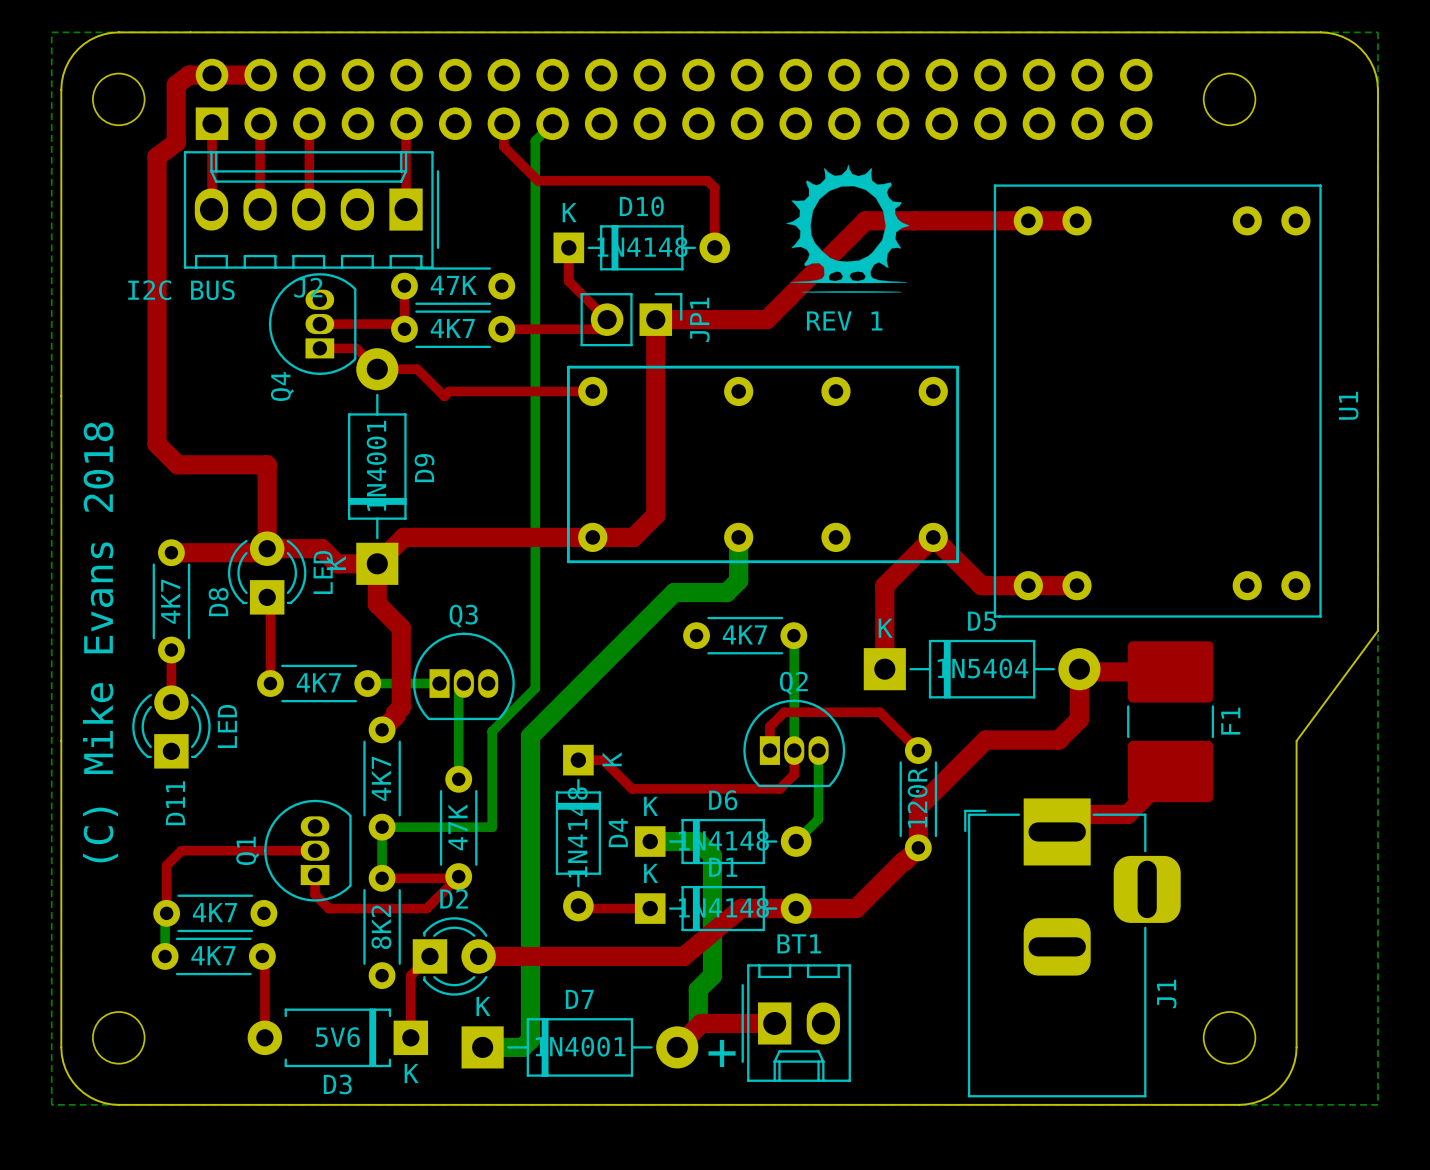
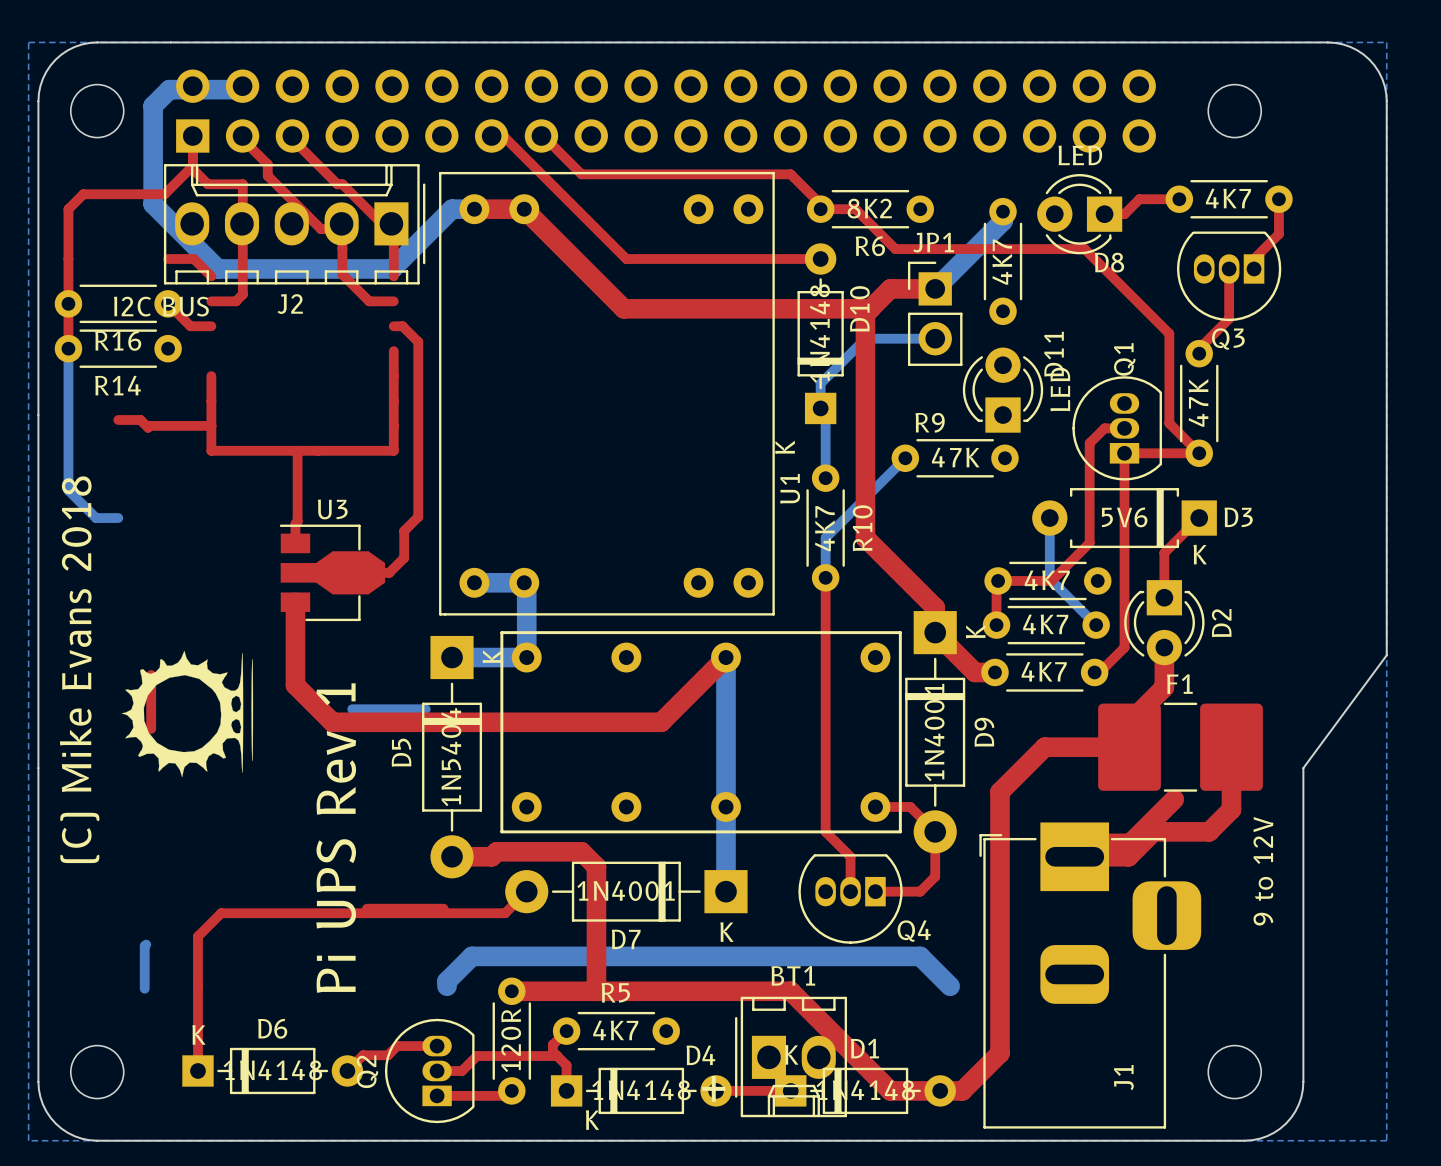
top track: (260, 75) (189, 75) (176, 85) (176, 142) (157, 156) (157, 444) (177, 464) (267, 464) (267, 548) -> none
bottom track: none -> (242, 89) (169, 89) (153, 105) (153, 204) (217, 268) (392, 268) (452, 209) (474, 209)
top track: none -> (491, 134) (501, 134) (626, 259) (820, 259)
top track: none -> (541, 134) (581, 174) (790, 174) (820, 204) (820, 209) (855, 209) (895, 249) (1084, 249) (1169, 333) (1169, 423) (1199, 453) (1124, 453) (1124, 647) (1099, 672) (1094, 672)
top track: (212, 123) (211, 209) -> none
top track: (260, 123) (260, 209) -> none
top track: (309, 123) (308, 209) -> none
top track: (406, 123) (406, 209) -> none
top track: (503, 123) (503, 146) (537, 180) (707, 180) (714, 187) (714, 247) -> none
bottom track: (552, 123) (535, 140) (535, 688) (492, 731) (492, 827) (382, 827) (382, 878) -> none
top track: none -> (192, 139) (192, 169) (207, 184) (242, 184) (242, 294) (235, 301) (211, 301)
top track: none -> (242, 139) (267, 164) (267, 175) (321, 229) (342, 229) (342, 274) (369, 301) (393, 301)
top track: none -> (292, 139) (337, 184) (342, 184) (393, 235) (393, 276)
top track: none -> (192, 165) (164, 194) (83, 194) (68, 209) (68, 348)
drawing: [786, 164, 910, 293] -> none
top track: none -> (1179, 199) (1139, 199) (1124, 214) (1104, 214)
part: none -> 4K7 (1229, 199)
top track: none -> (1278, 199) (1278, 234) (1254, 259) (1254, 268)
top track: none -> (474, 209) (524, 209) (623, 308) (870, 308)
R6: none -> 8K2 (870, 209)
bottom track: none -> (1003, 211) (1003, 221) (935, 288)
D10 name position: D10 (641, 206) -> D10 (859, 308)
top track: (1077, 220) (865, 220) (766, 319) (655, 319) (655, 515) (633, 537) (403, 537) (377, 563) -> none
D10 footprint: [553, 225, 731, 271] -> [797, 243, 844, 425]
top track: none -> (168, 259) (193, 259) (211, 276)
part: none -> 4K7 (1003, 261)
top track: (568, 247) (568, 281) (607, 319) (597, 329) (501, 329) -> none
top track: none -> (1229, 268) (1229, 318) (1199, 348) (1199, 353)
top track: none -> (935, 288) (890, 288) (865, 313) (865, 537) (935, 607) (935, 632) (975, 672) (995, 672)
top track: (404, 286) (404, 329) (399, 324) (319, 324) -> none
part: 47K (453, 286) -> none
R16: none -> (118, 303)
top track: none -> (168, 303) (190, 326) (211, 326)
top track: none -> (393, 326) (402, 326) (418, 341) (418, 516) (404, 530) (404, 557) (389, 572) (298, 572)
JP1 rotation: 0° (631, 319) -> 90° counterclockwise (935, 313)
JP1 position: (631, 319) -> (935, 313)
text: REV 1 (844, 320) -> none
bottom track: none -> (935, 338) (865, 338) (820, 383) (820, 408) (825, 413) (825, 478)
Q4 rotation: 0° (312, 324) -> 90° counterclockwise (850, 899)
Q4 position: (312, 324) -> (850, 899)
part: 4K7 (453, 329) -> none
bottom track: none -> (68, 348) (68, 490) (96, 518) (118, 518)
R14: none -> (118, 348)
top track: none -> (393, 351) (393, 450) (211, 450) (211, 376)
top track: (319, 348) (356, 348) (377, 369) (417, 369) (444, 396) (449, 391) (592, 391) -> none
part: none -> 47K (1199, 403)
top track: none -> (118, 419) (140, 419) (148, 427) (149, 425) (211, 425)
U1 position: (1157, 401) -> (606, 393)
U1 name position: U1 (1348, 405) -> U1 (790, 488)
top track: none -> (1124, 428) (1104, 428) (1089, 443) (1089, 542) (1051, 580) (998, 580) (996, 582) (996, 625)
top track: none -> (297, 450) (297, 521) (295, 523) (295, 543)
bottom track: none -> (905, 458) (825, 537) (825, 577)
R9: none -> 47K (955, 458)
part rotation: 0° (763, 464) -> 180° (701, 732)
part position: (763, 464) -> (701, 732)
D9 rotation: 0° (377, 466) -> 180° (935, 732)
D9 position: (377, 466) -> (935, 732)
bottom track: none -> (1049, 518) (1049, 578) (1096, 625)
top track: none -> (1199, 518) (1164, 552) (1164, 597)
R10: none -> 4K7 (825, 528)
bottom track: (738, 537) (738, 580) (726, 592) (674, 592) (530, 736) (530, 1039) (522, 1047) (482, 1047) -> none
top track: (267, 548) (321, 548) (337, 563) (377, 563) -> none
top track: (267, 548) (263, 552) (171, 552) -> none
U3: none -> (332, 572)
top track: none -> (825, 577) (825, 831) (850, 856) (850, 891)
part: none -> 4K7 (1047, 580)
bottom track: none -> (474, 582) (524, 582) (526, 585) (526, 657) (452, 657)
top track: (377, 563) (377, 604) (401, 627) (401, 707) (382, 729) -> none
D8 rotation: 0° (267, 573) -> 90° counterclockwise (1079, 214)
D8 position: (267, 573) -> (1079, 214)
top track: none -> (295, 602) (295, 685) (332, 722) (661, 722) (726, 657)
top track: (1077, 585) (981, 585) (933, 537) (884, 585) (884, 669) -> none
top track: (267, 597) (270, 600) (270, 683) -> none
part: 4K7 (171, 601) -> none
part: none -> 4K7 (1046, 625)
D5 name position: D5 (981, 621) -> D5 (401, 752)
top track: none -> (1164, 647) (1164, 687) (1129, 722) (1129, 747) (1044, 747) (999, 792) (999, 1053) (962, 1090) (890, 1090) (790, 991) (511, 991)
drawing: none -> [121, 650, 254, 778]
bottom track: none -> (726, 657) (726, 891)
part: 4K7 (745, 635) -> none
bottom track: (793, 635) (794, 750) -> none
part: none -> 4K7 (1044, 672)
D5 rotation: 0° (982, 669) -> 90° clockwise (452, 757)
D5 position: (982, 669) -> (452, 757)
top track: (1170, 671) (1082, 671) (1079, 669) (1079, 719) (1058, 740) (985, 740) (918, 807) (918, 847) (856, 908) (741, 908) (683, 956) (478, 956) -> none
Q3 rotation: 0° (463, 676) -> 180° (1229, 276)
Q3 position: (463, 676) -> (1229, 276)
part: 4K7 (319, 683) -> none
bottom track: (463, 683) (458, 688) (458, 779) -> none
top track: none -> (1231, 747) (1231, 809) (1209, 831) (1153, 831) (1128, 856) (1074, 856)
F1 rotation: 0° (1170, 721) -> 90° clockwise (1180, 747)
F1 name position: F1 (1230, 721) -> F1 (1179, 684)
D11 position: (171, 727) -> (1003, 390)
Q2 rotation: 0° (794, 743) -> 90° counterclockwise (429, 1070)
Q2 position: (794, 743) -> (429, 1070)
D4 footprint: [555, 744, 601, 922] -> [550, 1067, 732, 1115]
top track: (769, 750) (769, 726) (784, 712) (880, 712) (918, 750) -> none
top track: (794, 750) (794, 774) (779, 788) (632, 788) (603, 760) (578, 760) -> none
bottom track: (818, 750) (818, 819) (796, 841) -> none
part: 4K7 (382, 778) -> none
top track: none -> (875, 806) (910, 806) (935, 831) (935, 876) (920, 891) (875, 891)
part position: (918, 799) -> (511, 1041)
D11 name position: D11 (175, 803) -> D11 (1054, 354)
text: none -> Pi UPS Rev 1 (336, 838)
part: 47K (458, 827) -> none
top track: none -> (452, 856) (491, 856) (496, 851) (581, 851) (596, 866) (596, 991)
bottom track: (650, 841) (698, 841) (712, 855) (712, 975) (698, 989) (698, 1026) (677, 1047) -> none
D6 position: (723, 841) -> (272, 1070)
text: none -> 9 to 12V (1263, 871)
Q1 name position: Q1 (247, 850) -> Q1 (1124, 359)
Q1 position: (307, 850) -> (1117, 428)
top track: (315, 850) (181, 850) (166, 865) (166, 913) -> none
top track: none -> (526, 891) (505, 913) (221, 913) (197, 936) (197, 1070)
top track: (315, 875) (315, 894) (328, 908) (426, 908) (458, 876) -> none
top track: (578, 906) (580, 908) (650, 908) (652, 910) -> none
D1 position: (723, 908) -> (865, 1090)
part: 4K7 (215, 913) -> none
part: 8K2 (382, 926) -> none
J1 position: (1072, 947) -> (1090, 975)
bottom track: none -> (447, 986) (447, 981) (471, 956) (920, 956) (950, 986)
part: 4K7 (213, 956) -> none
top track: (262, 956) (264, 958) (264, 1037) -> none
top track: (429, 956) (410, 975) (410, 1037) -> none
D2 rotation: 0° (454, 956) -> 90° clockwise (1164, 622)
D2 position: (454, 956) -> (1164, 622)
J1 name position: J1 (1166, 993) -> J1 (1123, 1077)
top track: none -> (566, 1031) (552, 1044) (552, 1051) (566, 1065) (566, 1090)
R5: none -> 4K7 (616, 1031)
top track: none -> (437, 1046) (397, 1046) (388, 1055) (363, 1055) (347, 1070)
top track: none -> (557, 1056) (476, 1056) (461, 1070) (437, 1070)
top track: (774, 1023) (701, 1023) (677, 1047) -> none
D3 position: (337, 1037) -> (1124, 518)
D7 rotation: 0° (579, 1047) -> 180° (626, 891)
D7 position: (579, 1047) -> (626, 891)
top track: none -> (511, 1090) (506, 1095) (437, 1095)
top track: none -> (716, 1090) (790, 1090)
D3 name position: D3 (337, 1084) -> D3 (1238, 517)

